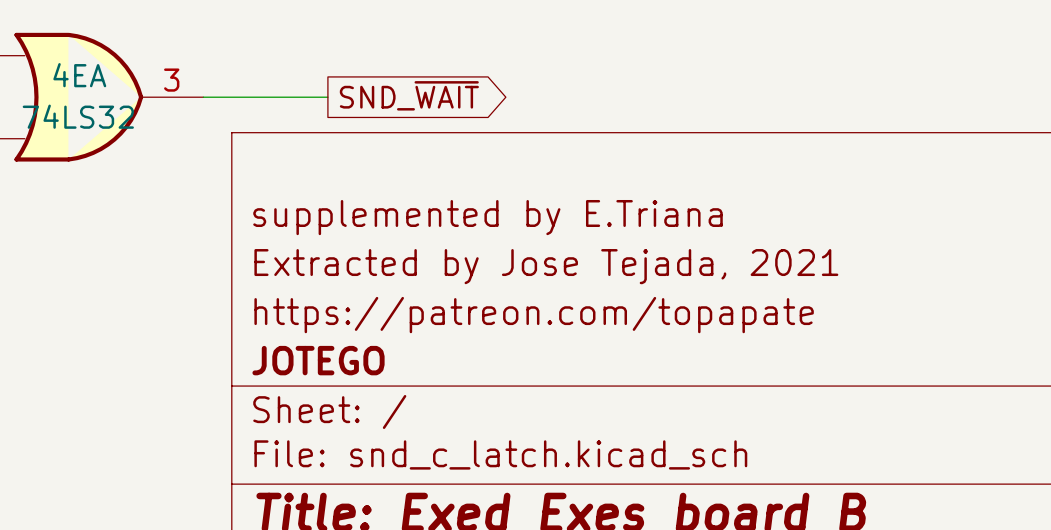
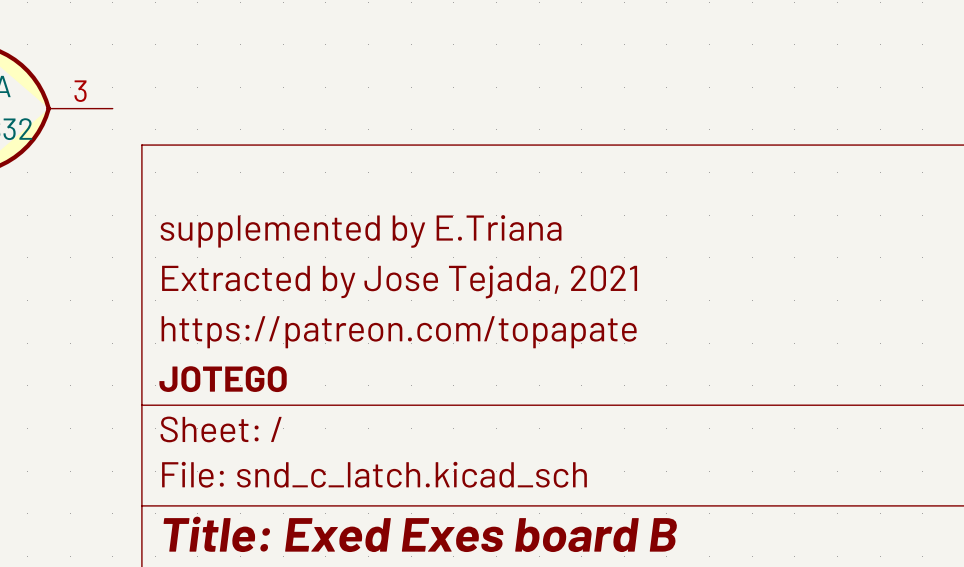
global label: SND_~{WAIT} (409, 95) -> none
wire: (203, 97) (327, 97) -> none

